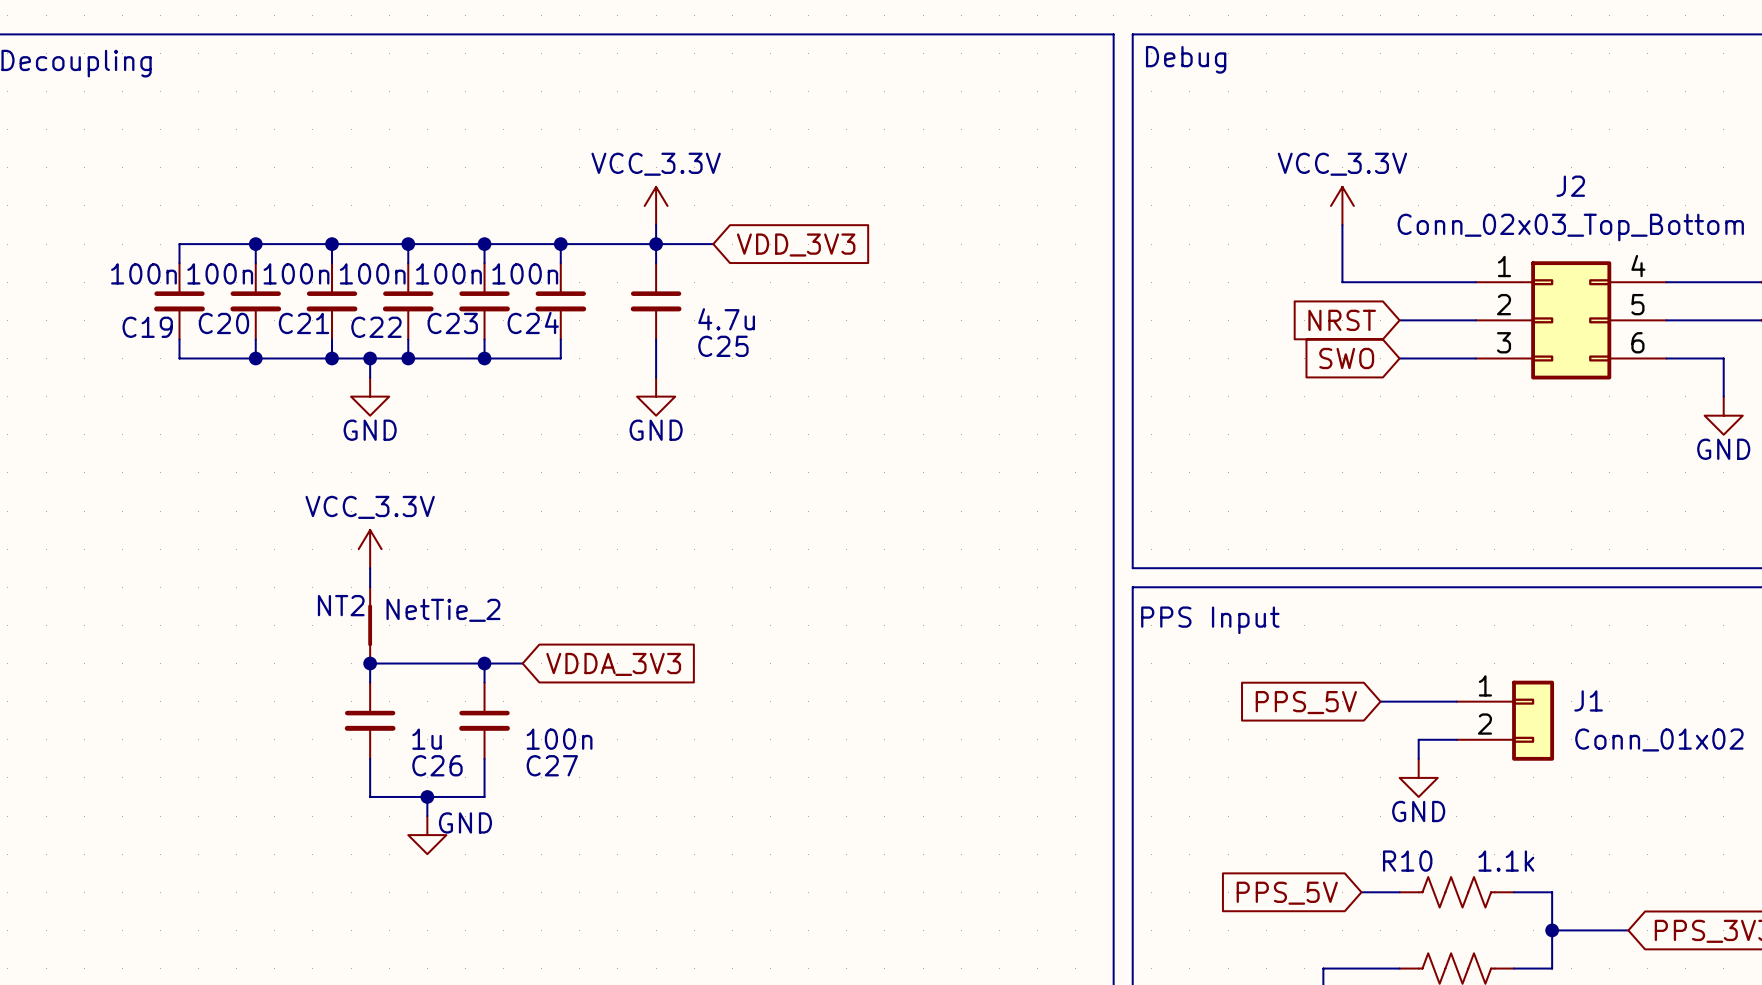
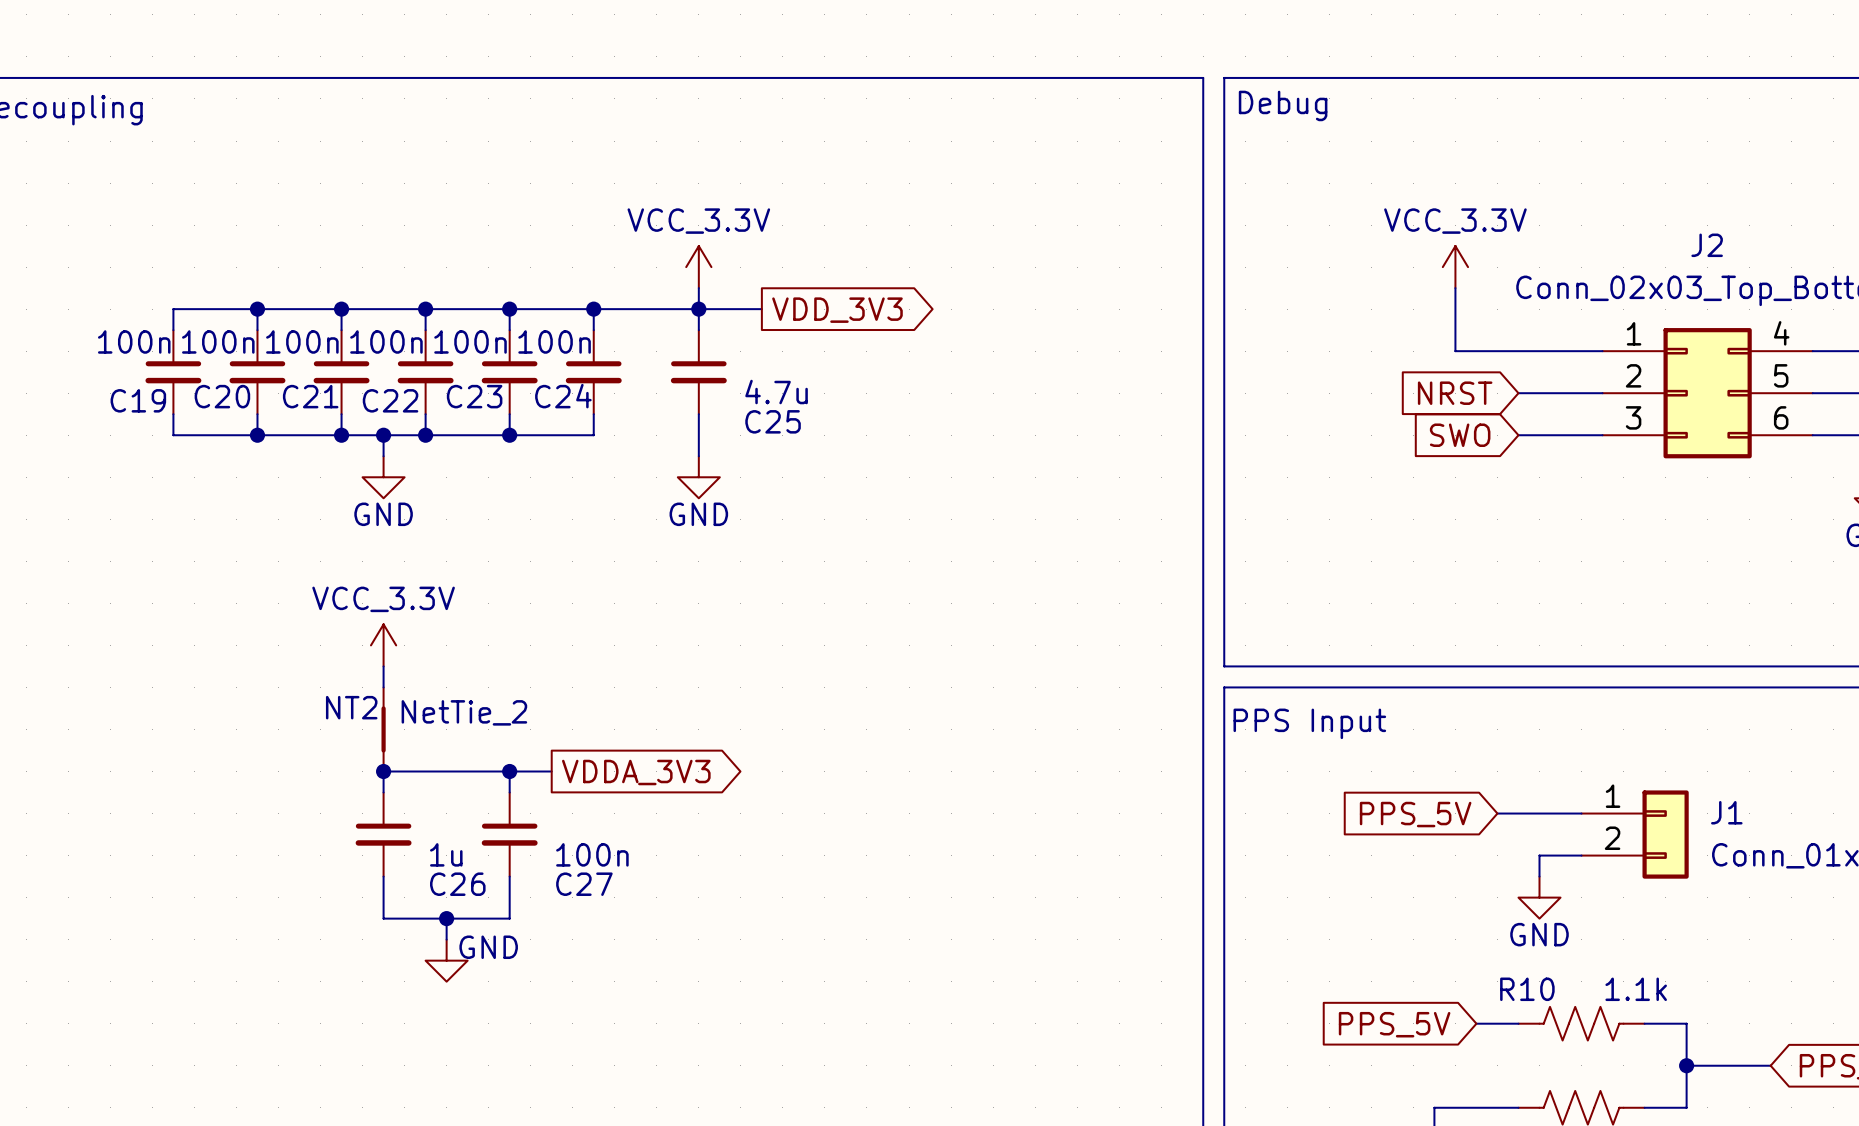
global label shape: input (796, 245) -> output (837, 310)
global label shape: input (613, 664) -> output (636, 772)

